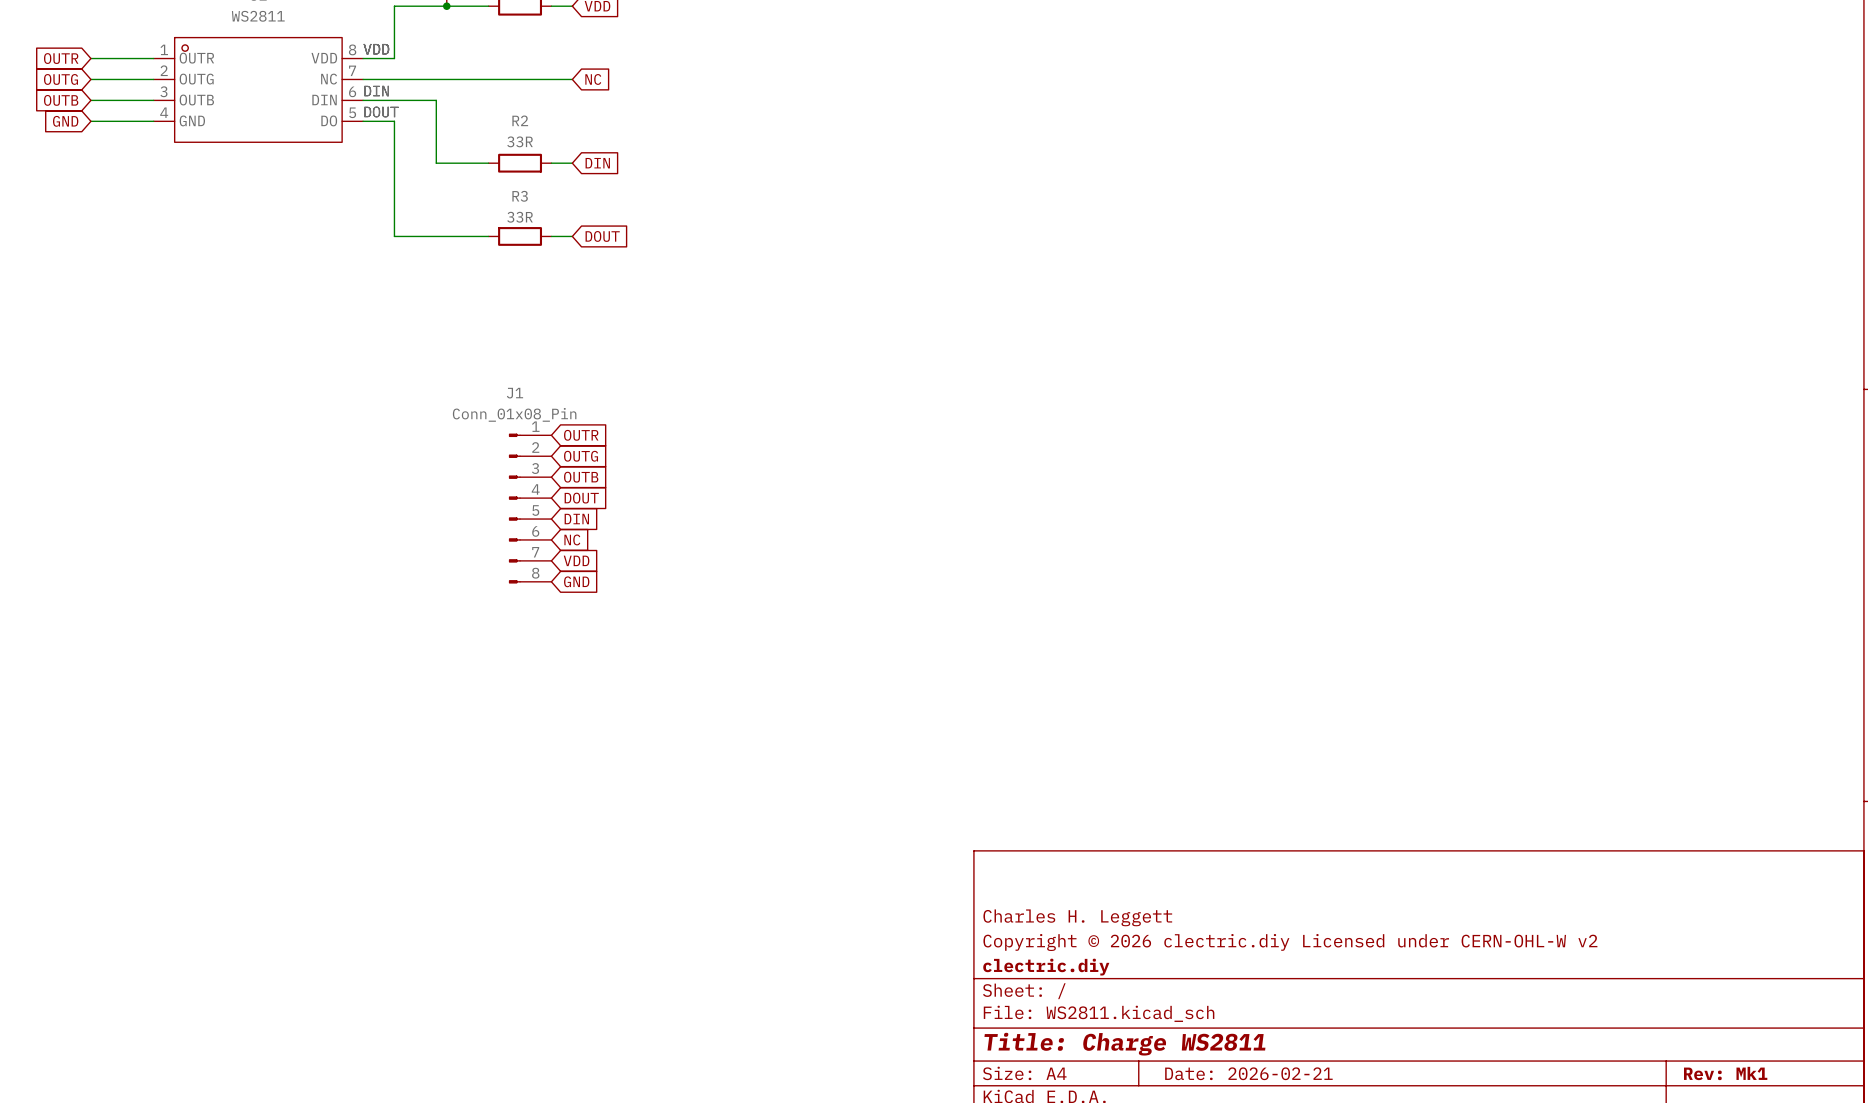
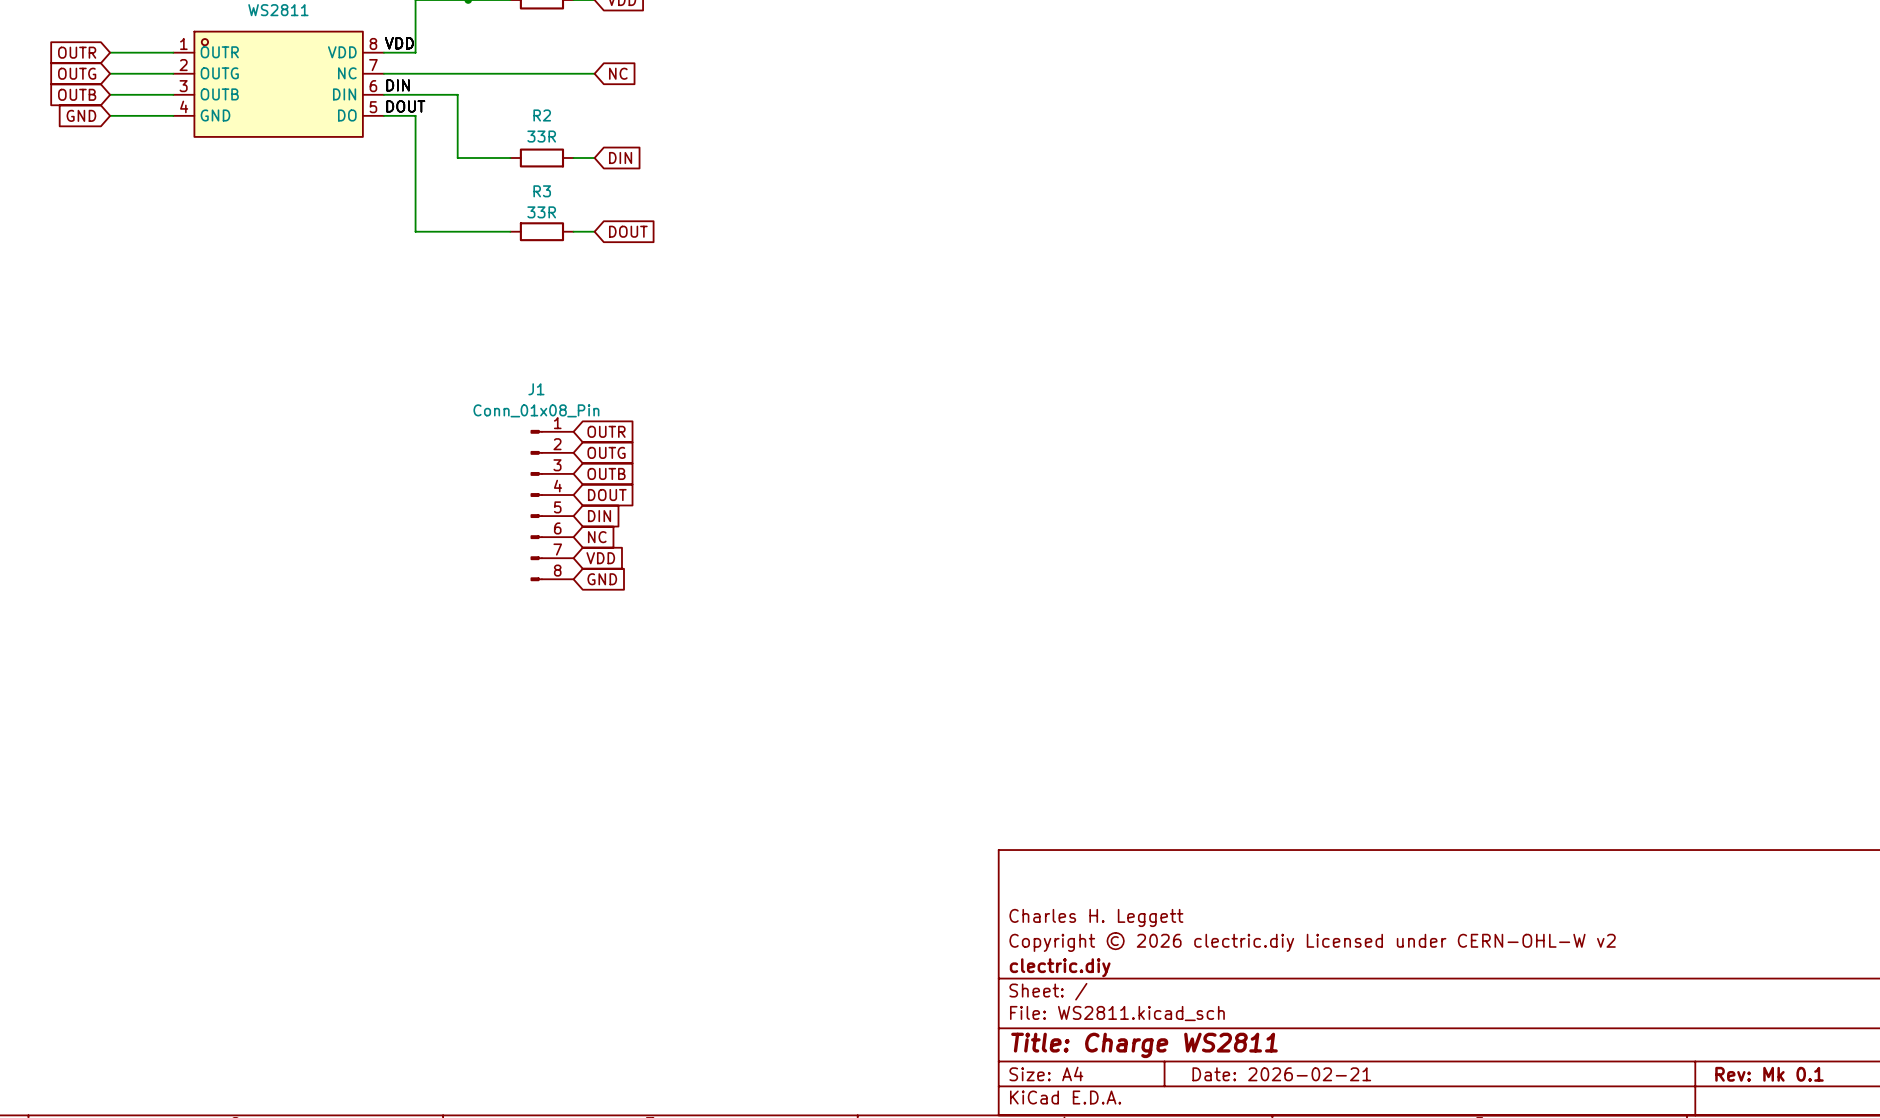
title block: Rev: Mk1 (1725, 1073) -> Rev: Mk 0.1 (1769, 1074)

